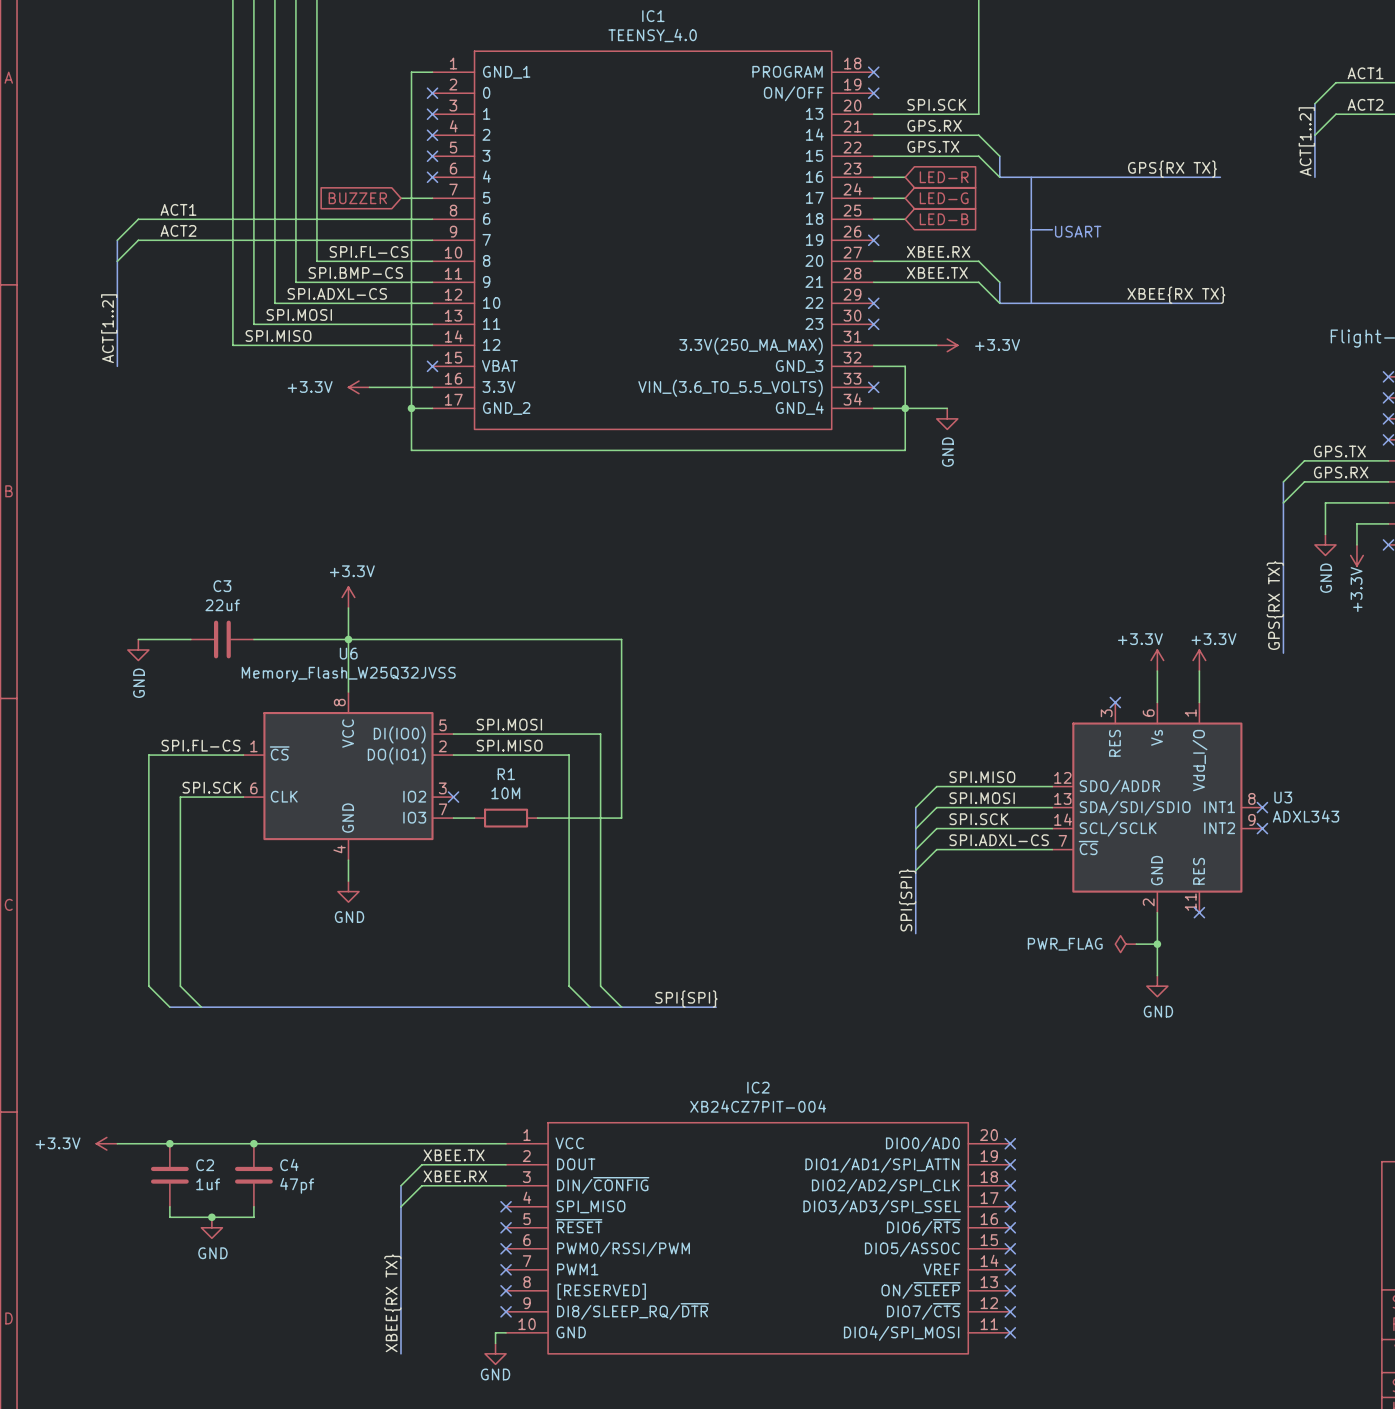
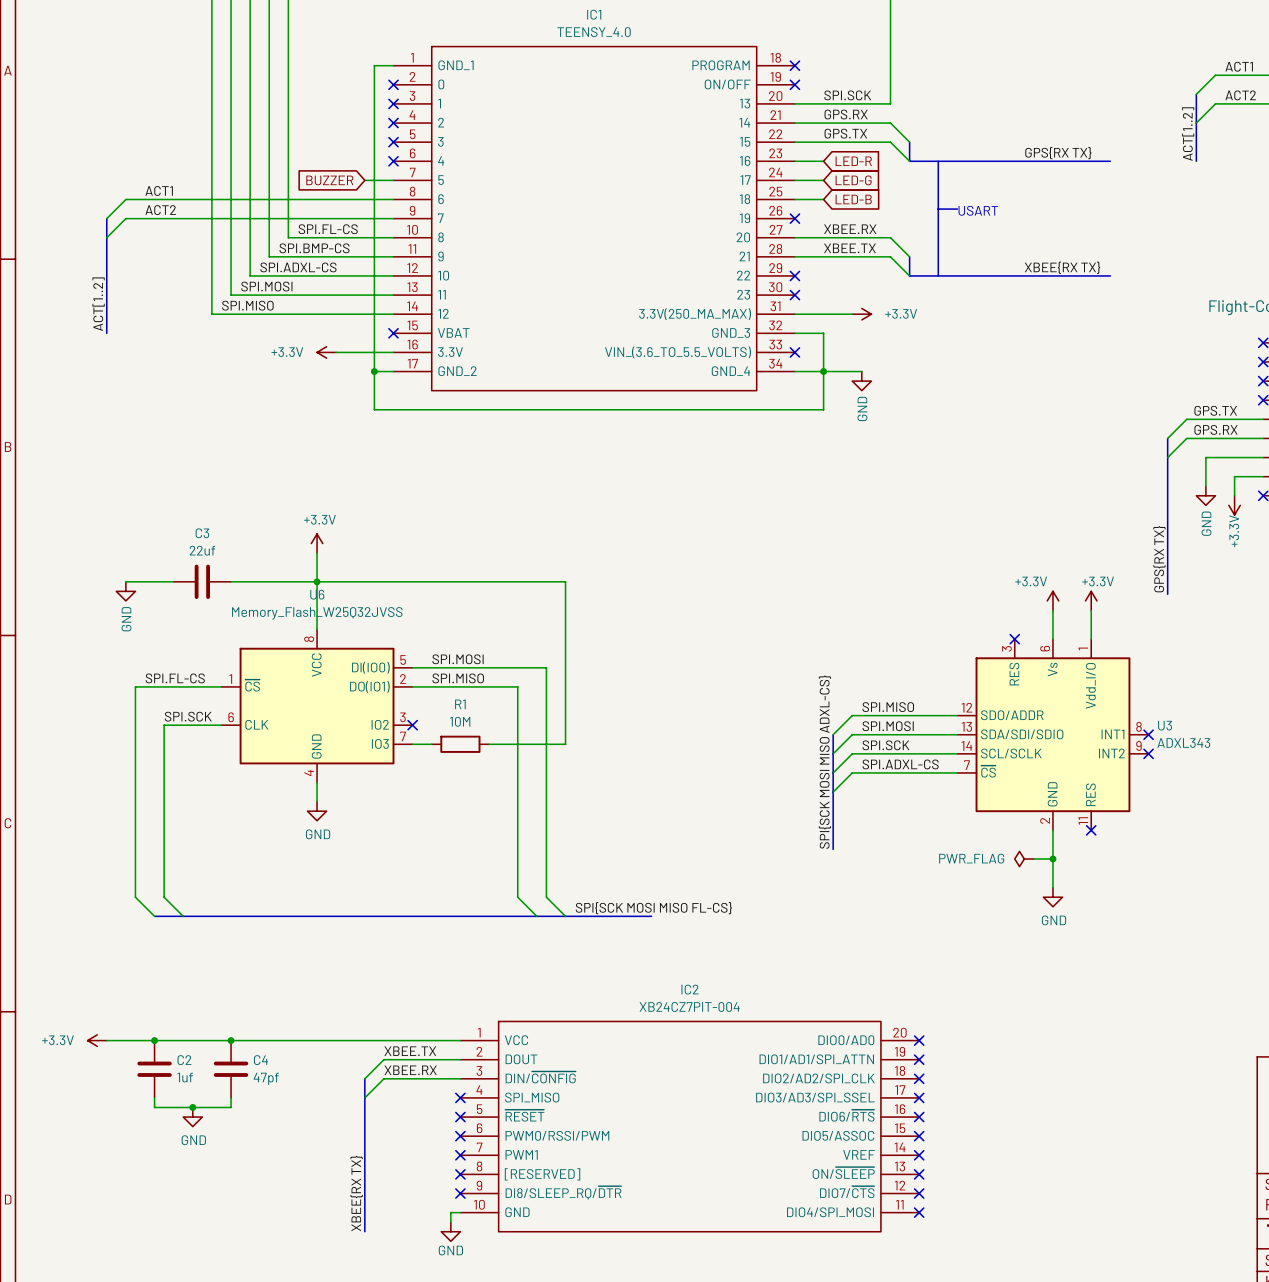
label: SPI{SPI} (907, 900) -> SPI{SCK MOSI MISO ADXL-CS} (824, 762)
label: SPI{SPI} (686, 999) -> none
label: none -> SPI{SCK MOSI MISO FL-CS} (653, 908)

